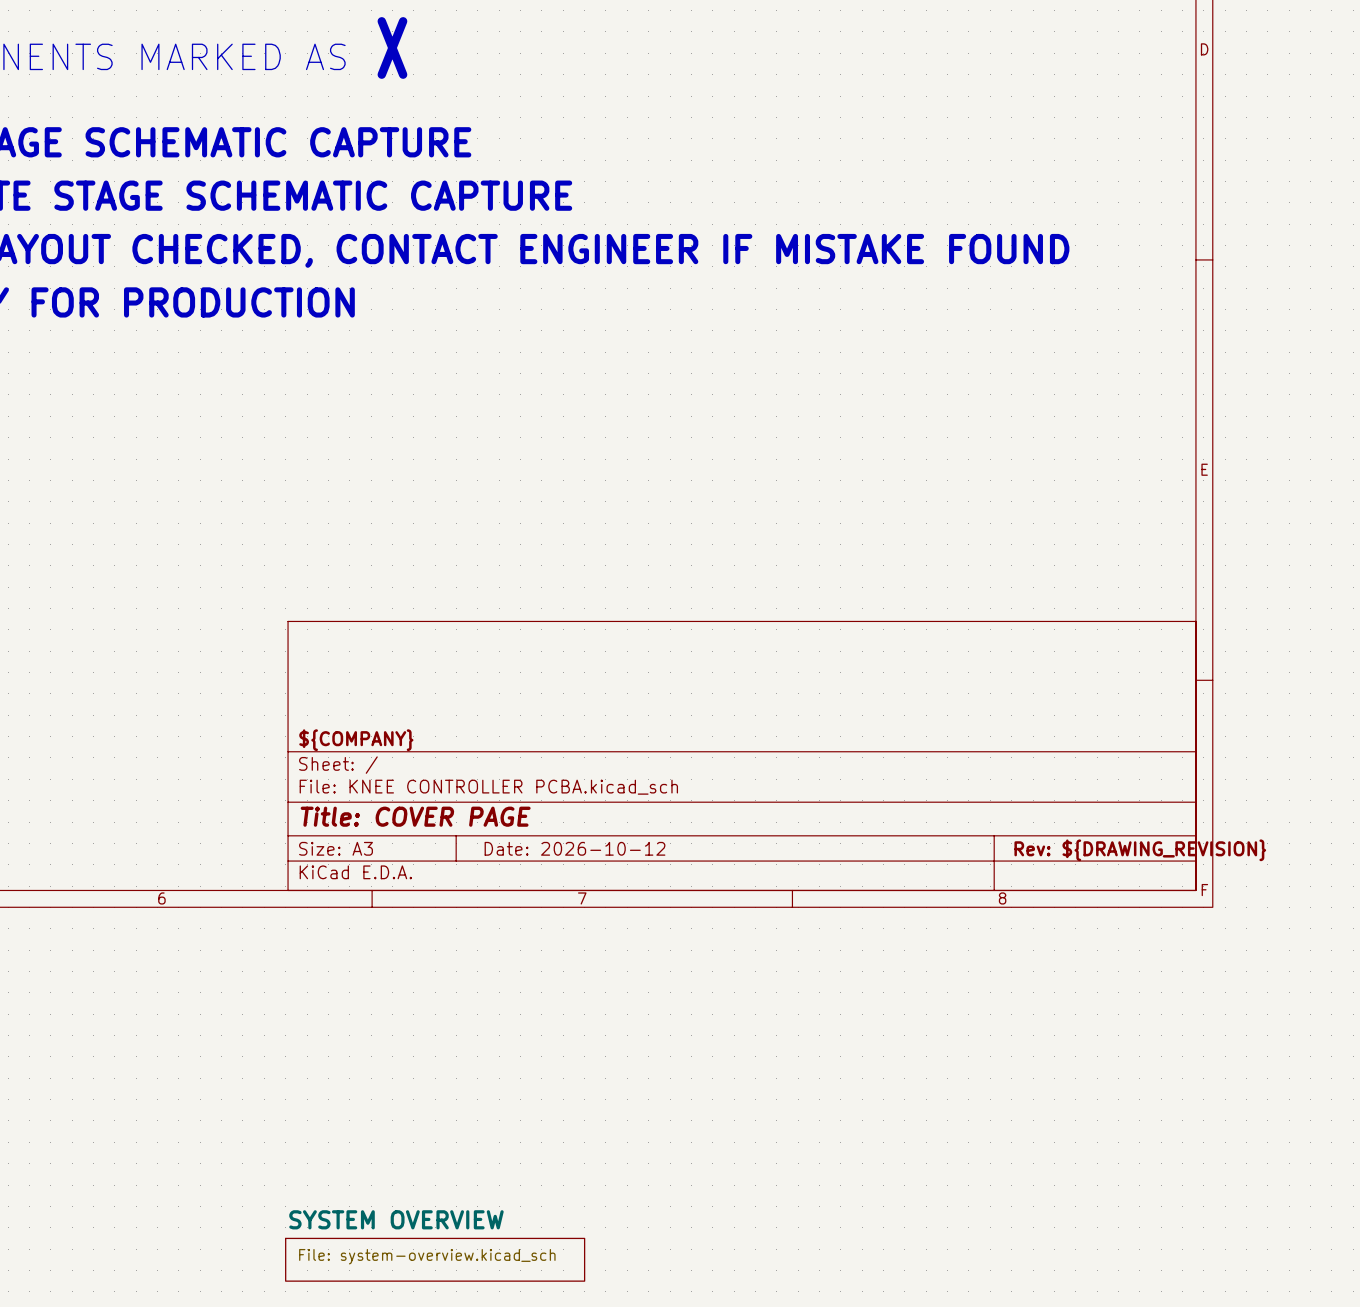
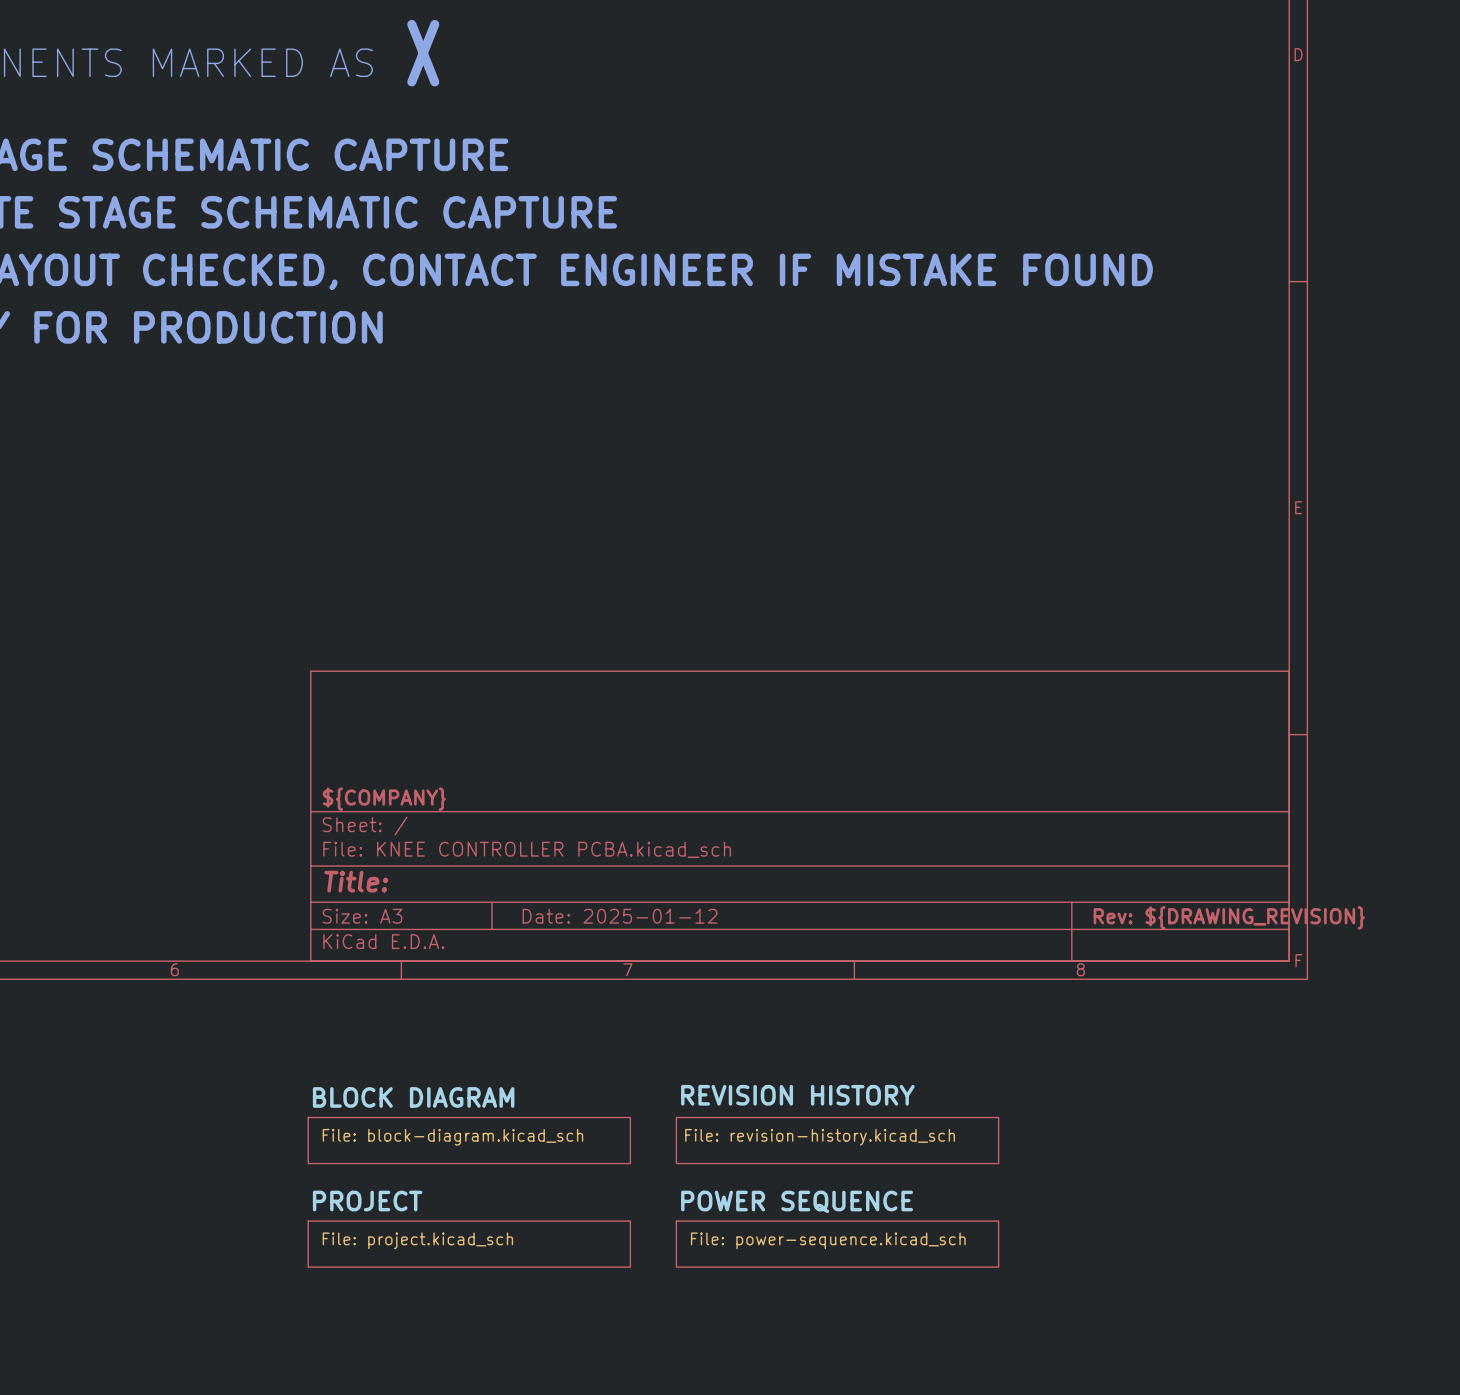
title block: Title: COVER PAGE (415, 816) -> Title: (356, 881)
title block: Date: 2026-10-12 (575, 848) -> Date: 2025-01-12 (620, 916)
sheet BLOCK DIAGRAM: none -> File: block-diagram.kicad_sch (469, 1140)
sheet REVISION HISTORY: none -> File: revision-history.kicad_sch (837, 1140)
sheet PROJECT: none -> File: project.kicad_sch (469, 1244)
sheet POWER SEQUENCE: none -> File: power-sequence.kicad_sch (837, 1244)
sheet SYSTEM OVERVIEW: File: system-overview.kicad_sch (435, 1259) -> none

